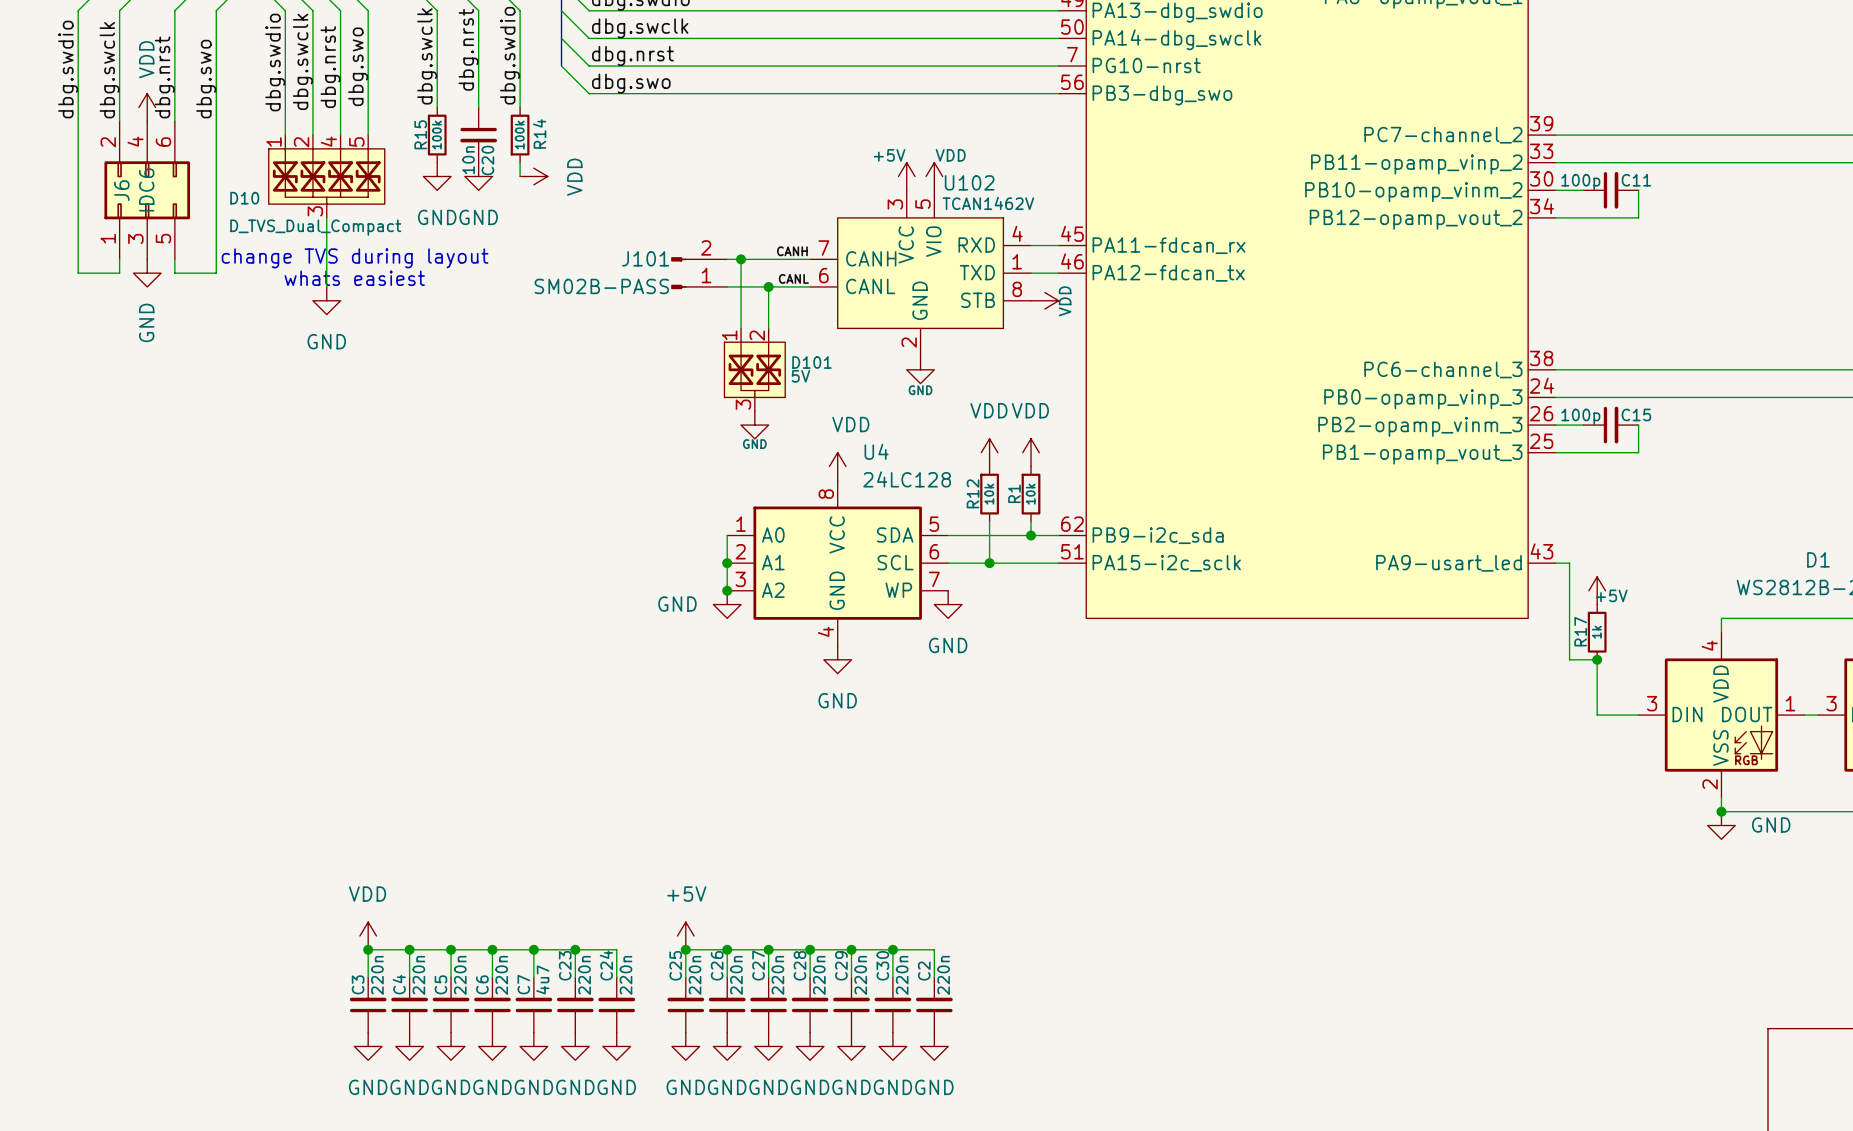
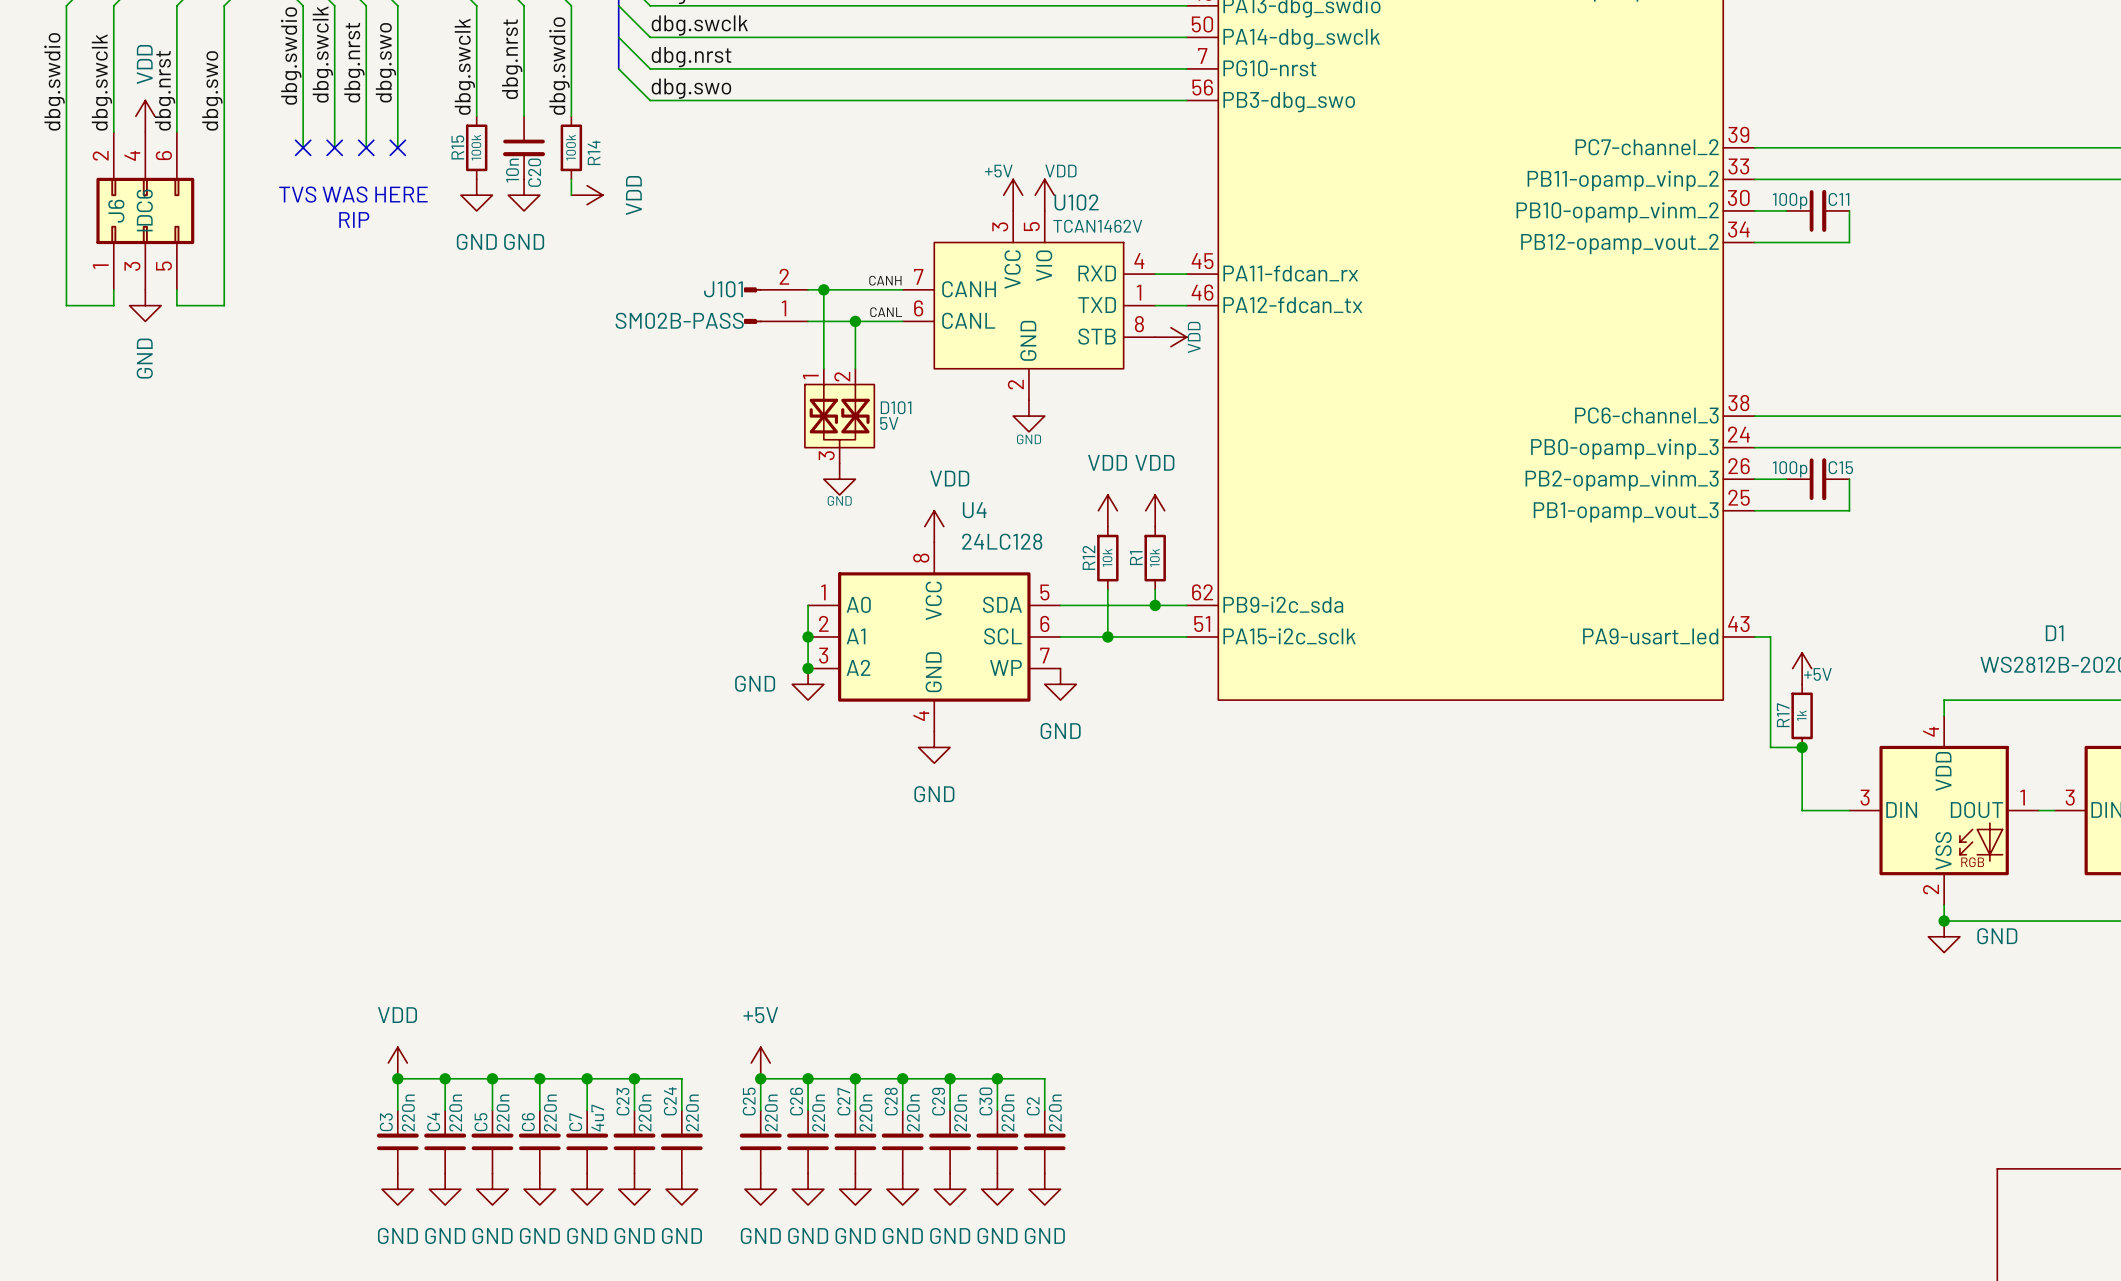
no-connect mark: none -> (303, 147)
no-connect mark: none -> (334, 147)
no-connect mark: none -> (366, 147)
no-connect mark: none -> (397, 147)
text: none -> TVS WAS HERE (353, 194)
D10: D_TVS_Dual_Compact (326, 176) -> none
text: none -> RIP (354, 219)
wire: (326, 217) (326, 286) -> none
text: change TVS during layout (355, 258) -> none
text: whats easiest (354, 278) -> none
power symbol: GND (326, 300) -> none

